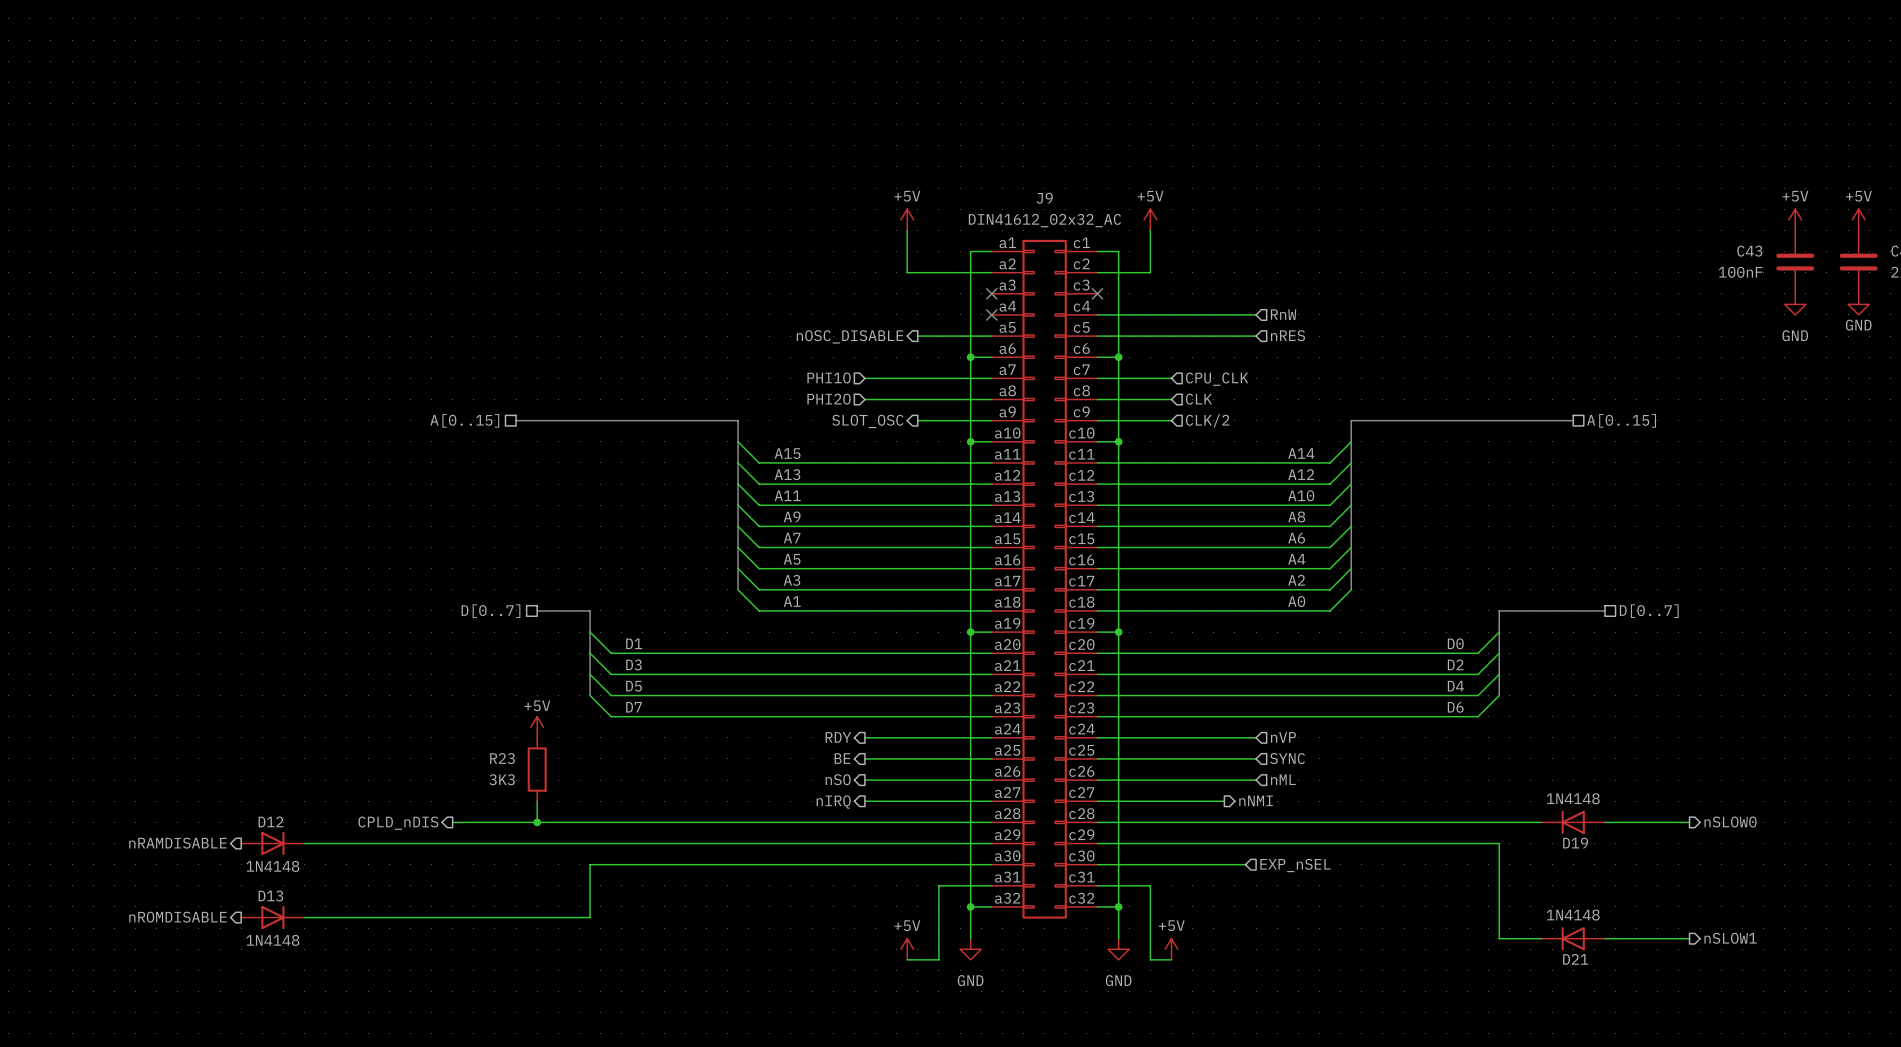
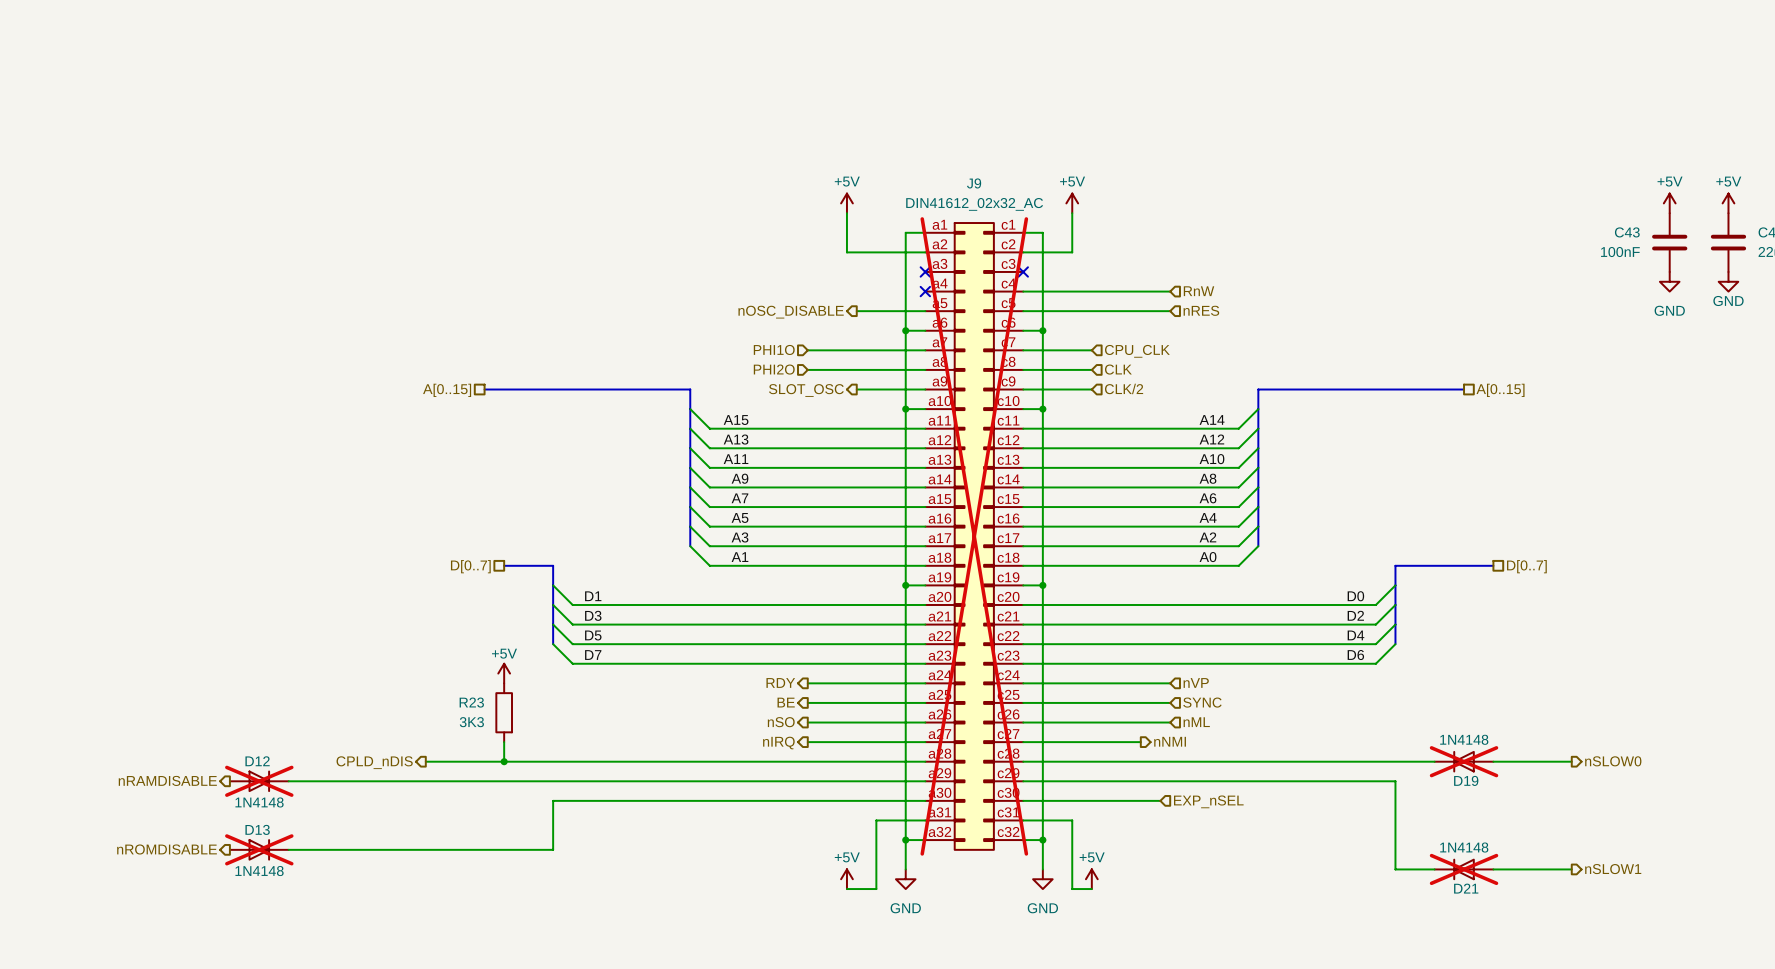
J9 do-not-place cross: none -> (974, 536)
D19 do-not-place cross: none -> (1464, 761)
D12 do-not-place cross: none -> (259, 781)
D13 do-not-place cross: none -> (259, 849)
D21 do-not-place cross: none -> (1464, 869)

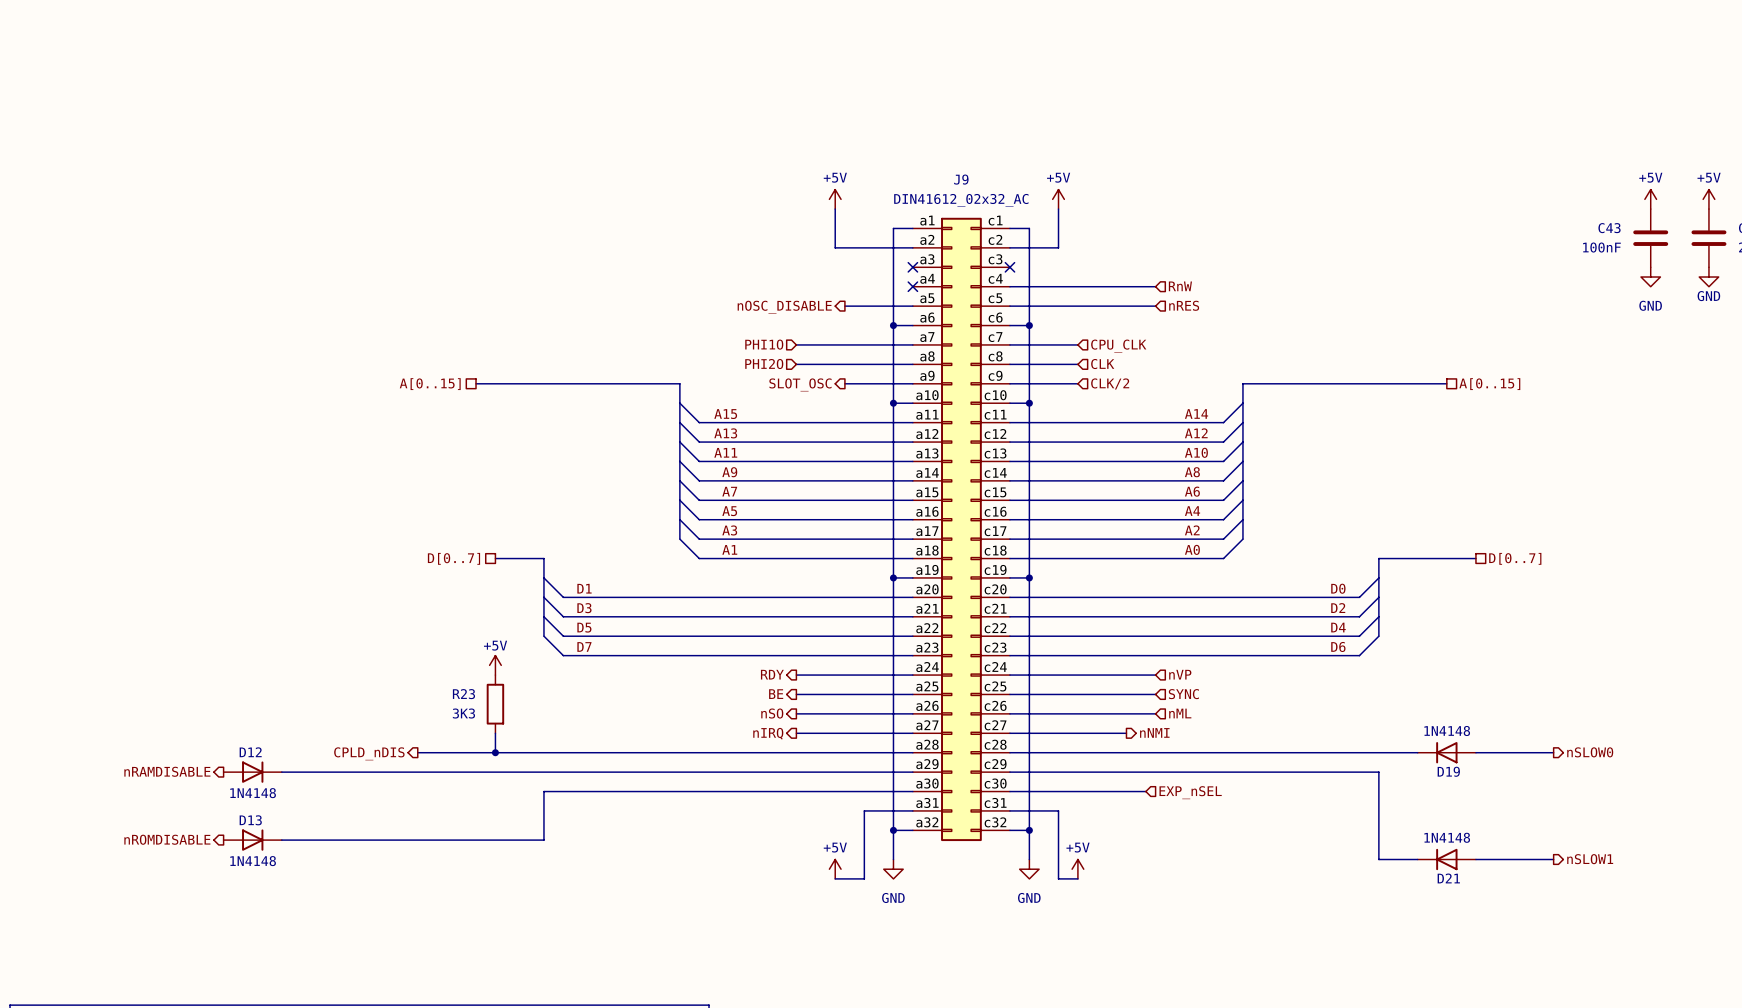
J9 do-not-place cross: (974, 536) -> none
D19 do-not-place cross: (1464, 761) -> none
D12 do-not-place cross: (259, 781) -> none
D13 do-not-place cross: (259, 849) -> none
D21 do-not-place cross: (1464, 869) -> none

